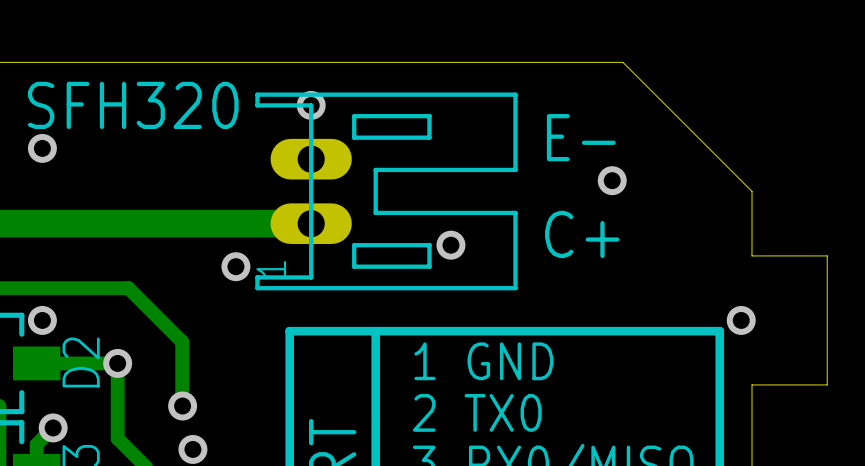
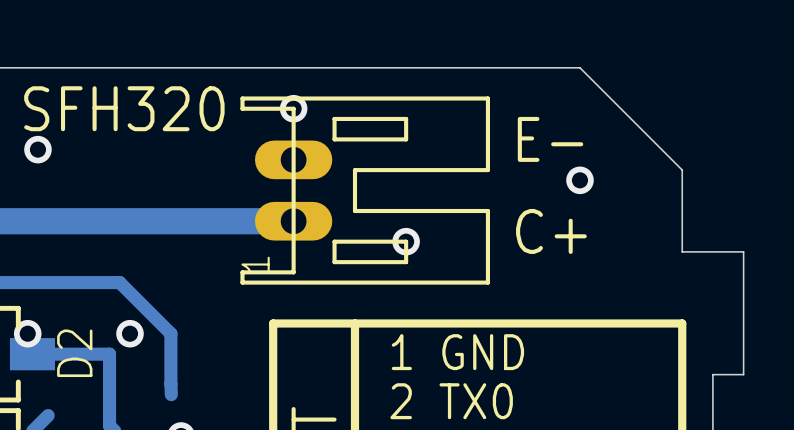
board edge: (612, 62) (622, 62) (752, 191) (752, 255) -> (579, 67) (682, 170) (682, 251) (712, 251)
via position: (450, 245) -> (406, 241)
board edge: (784, 255) (827, 255) (827, 384) (784, 384) -> (743, 251) (743, 374)
via: (235, 266) -> none
via position: (42, 320) -> (27, 333)
via: (741, 320) -> none
via position: (117, 363) -> (130, 333)
via: (182, 406) -> none
via: (53, 427) -> none

